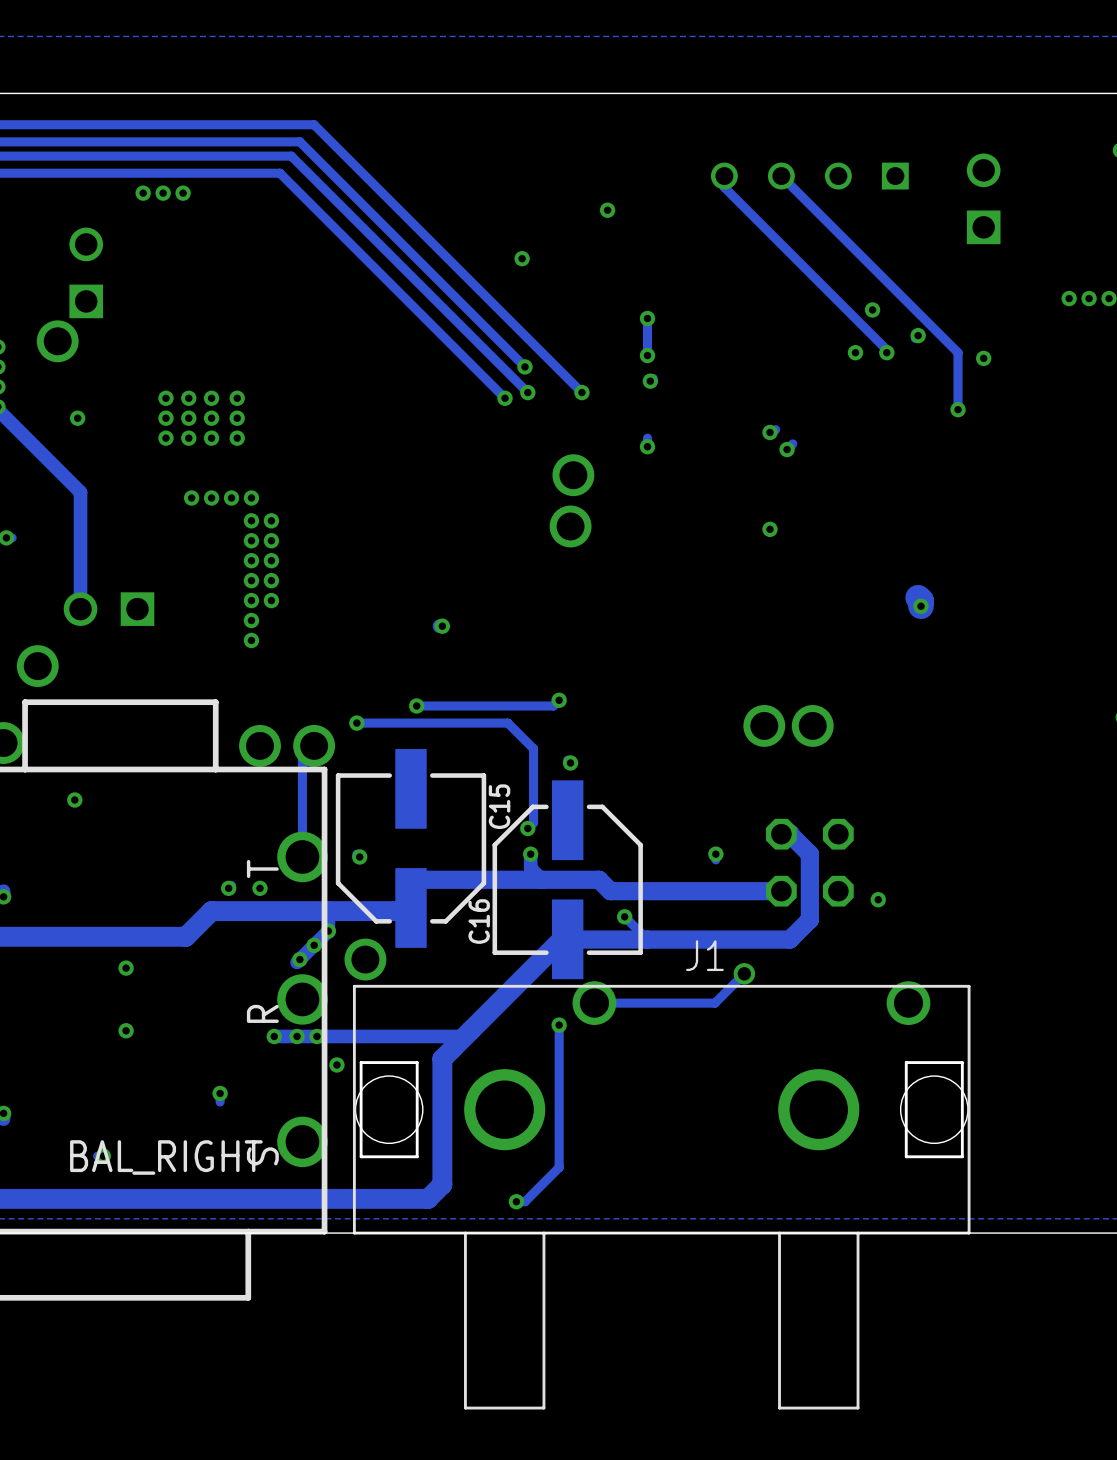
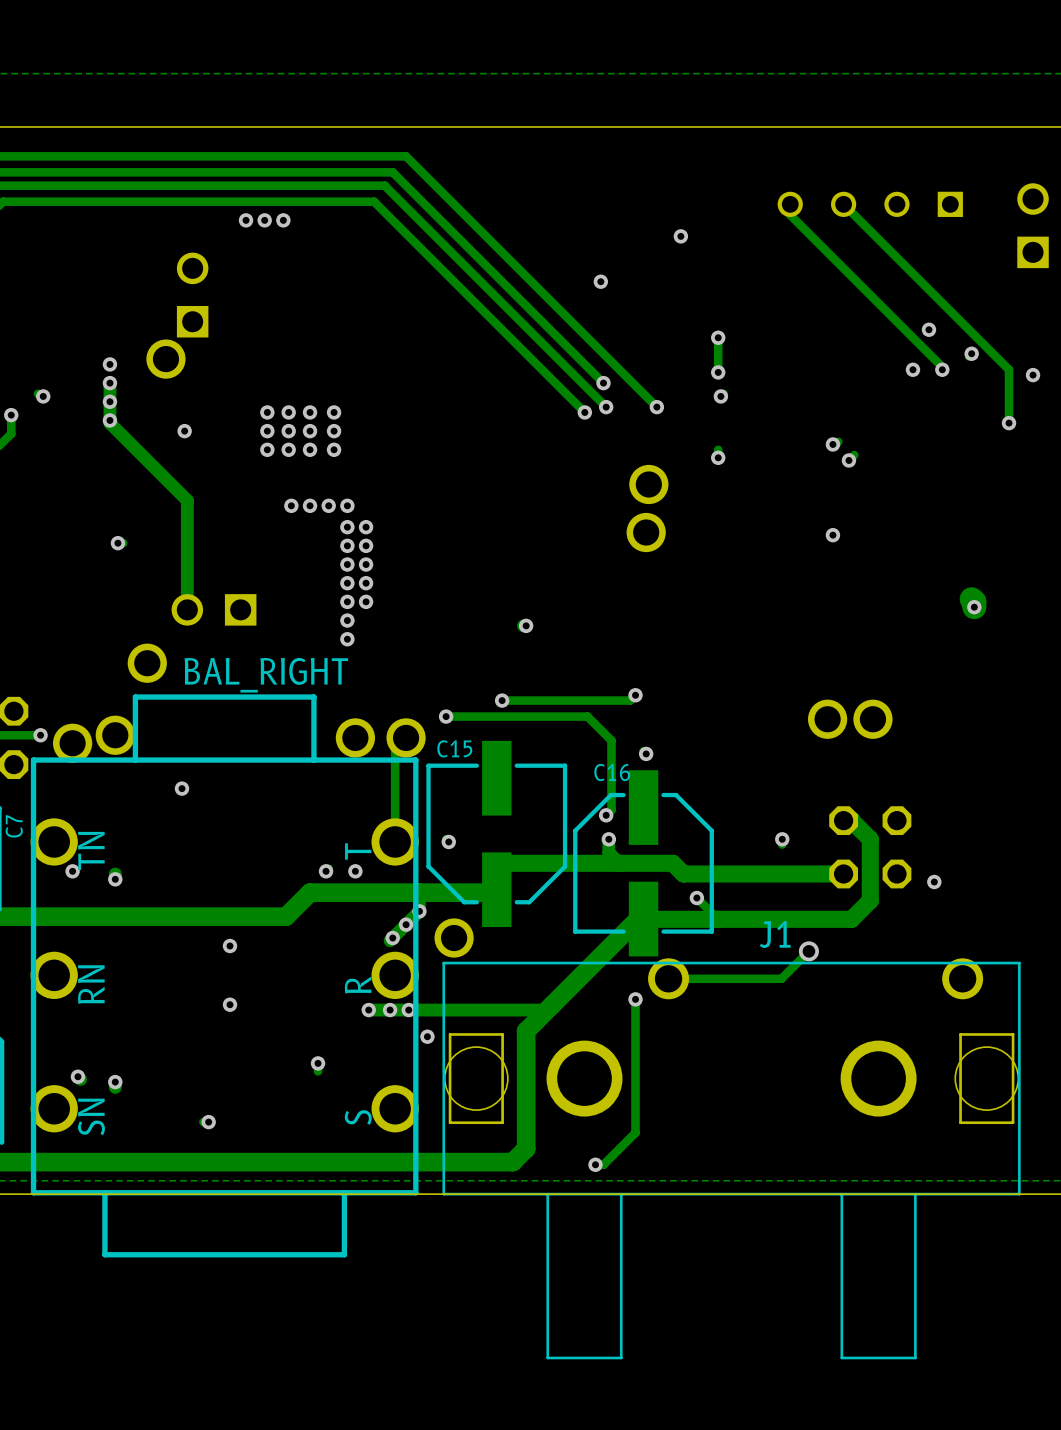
C15 name rotation: 0° (499, 806) -> 90° clockwise (454, 748)
C15 name position: C15 (499, 806) -> C15 (454, 748)
C16 name rotation: 0° (479, 921) -> 90° clockwise (612, 772)
C16 name position: C16 (479, 921) -> C16 (612, 772)
BAL_RIGHT name position: BAL_RIGHT (166, 1157) -> BAL_RIGHT (266, 675)

